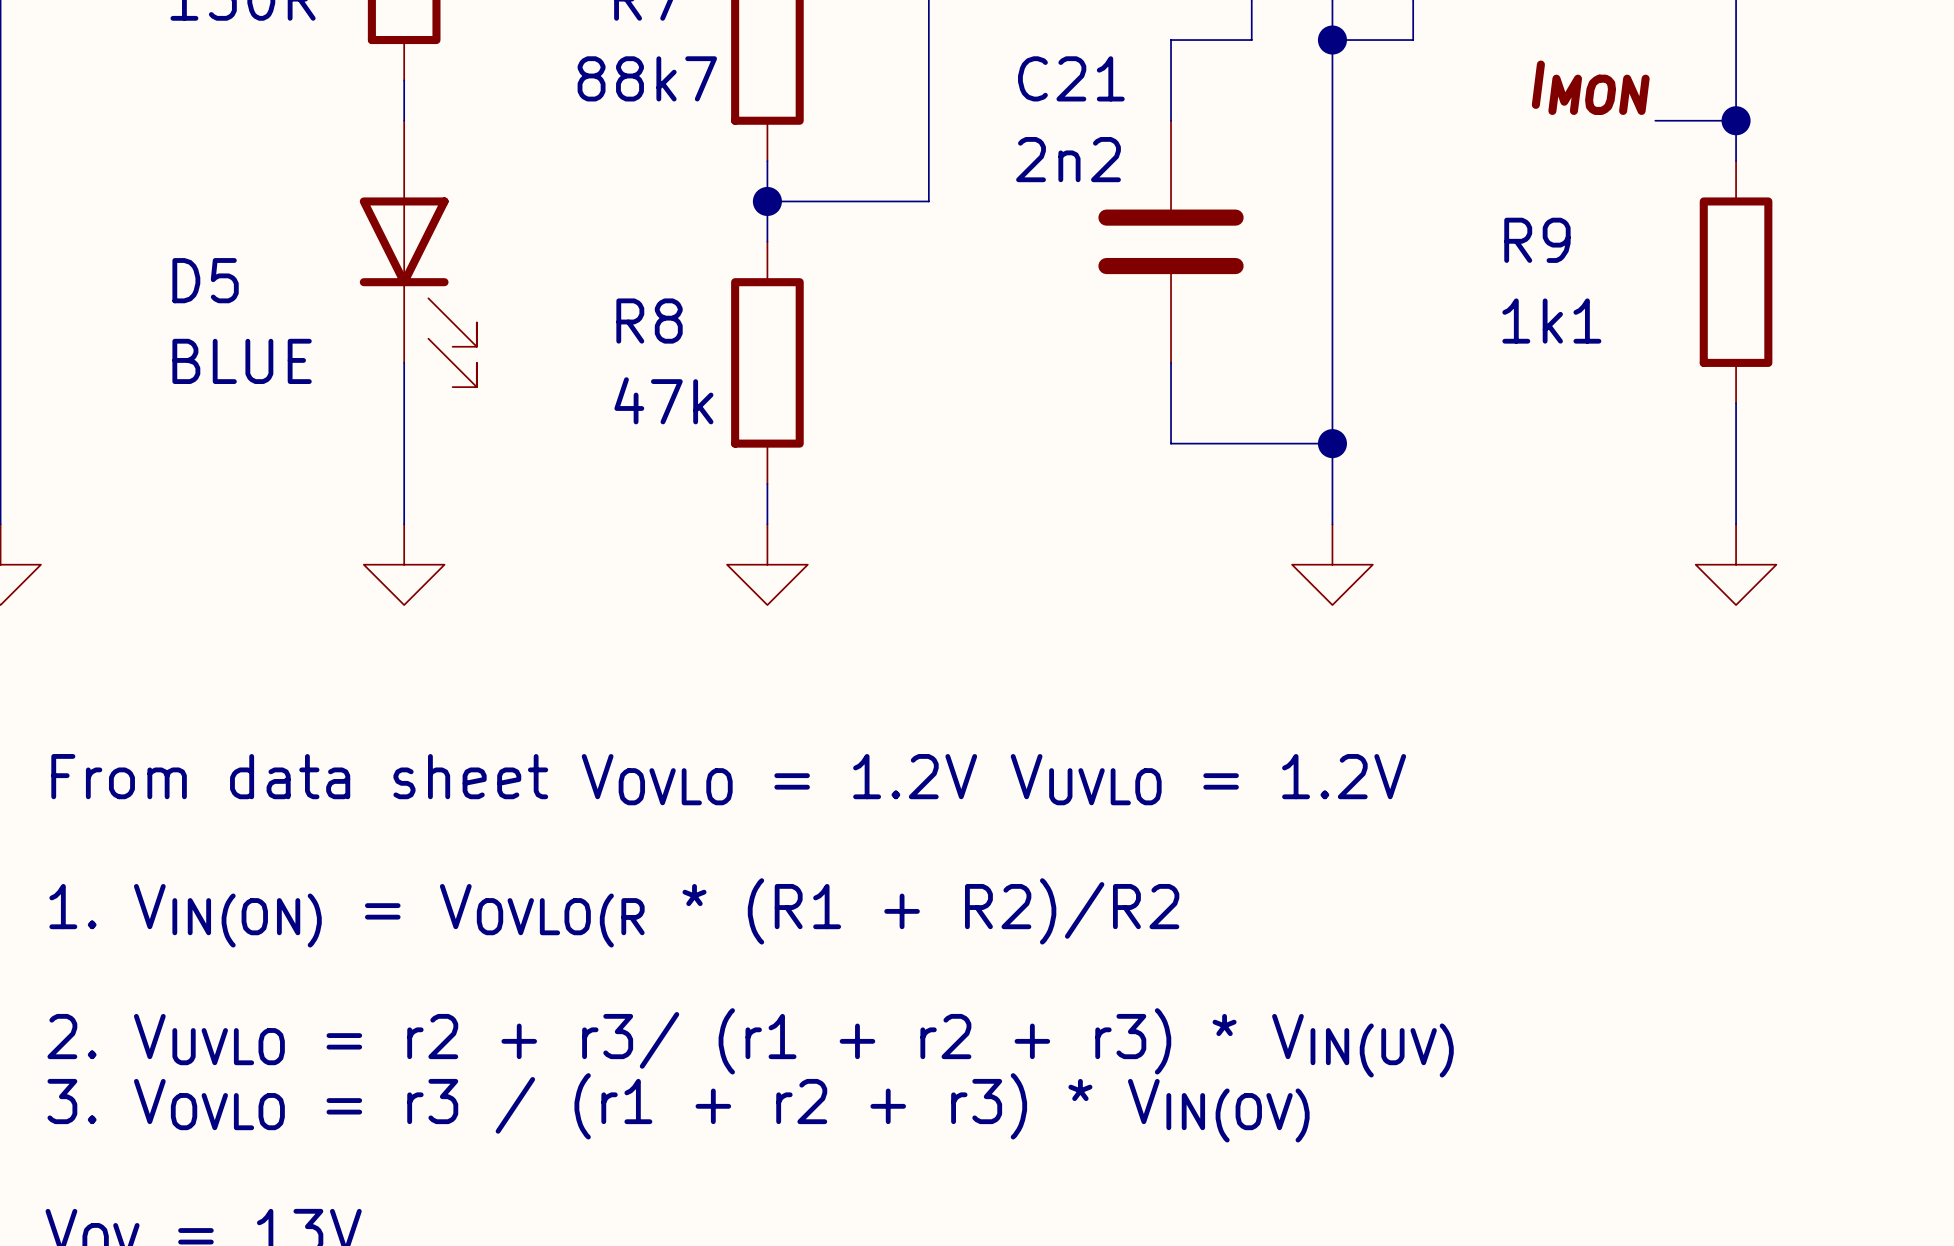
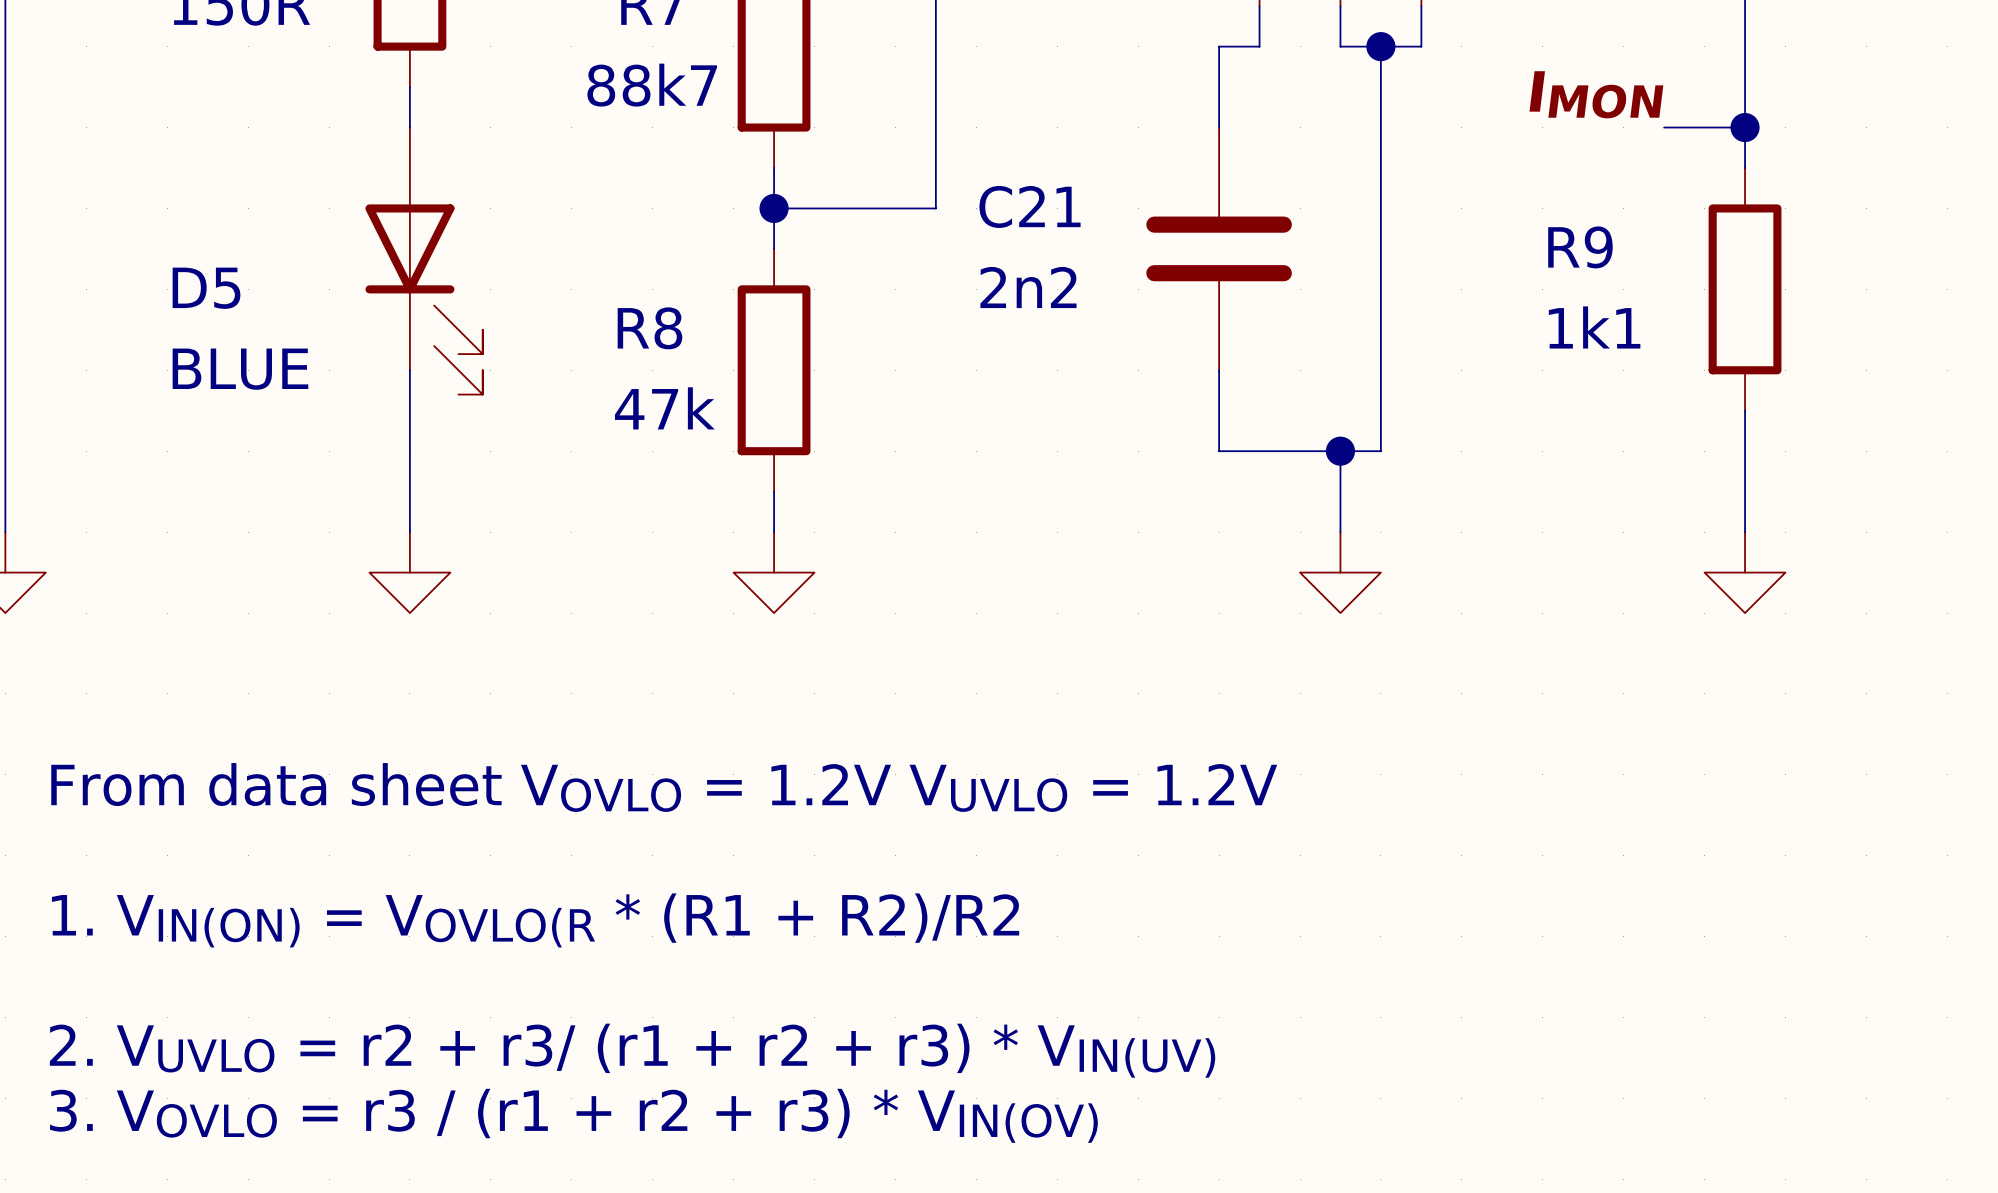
wire: (1211, 40) (1171, 40) (1171, 120) -> (1219, 46) (1219, 127)
wire: (1332, 40) (1332, 443) -> (1380, 46) (1380, 451) (1340, 451)
junction position: (1332, 40) -> (1380, 46)
C21 name position: C21 (1071, 78) -> C21 (1030, 206)
C21 value position: 2n2 (1068, 159) -> 2n2 (1028, 287)
R9 name position: R9 (1537, 240) -> R9 (1580, 247)
C21 position: (1171, 241) -> (1219, 248)
R9 value position: 1k1 (1551, 321) -> 1k1 (1594, 327)
wire: (1171, 362) (1171, 443) (1211, 443) -> (1219, 370) (1219, 451)

